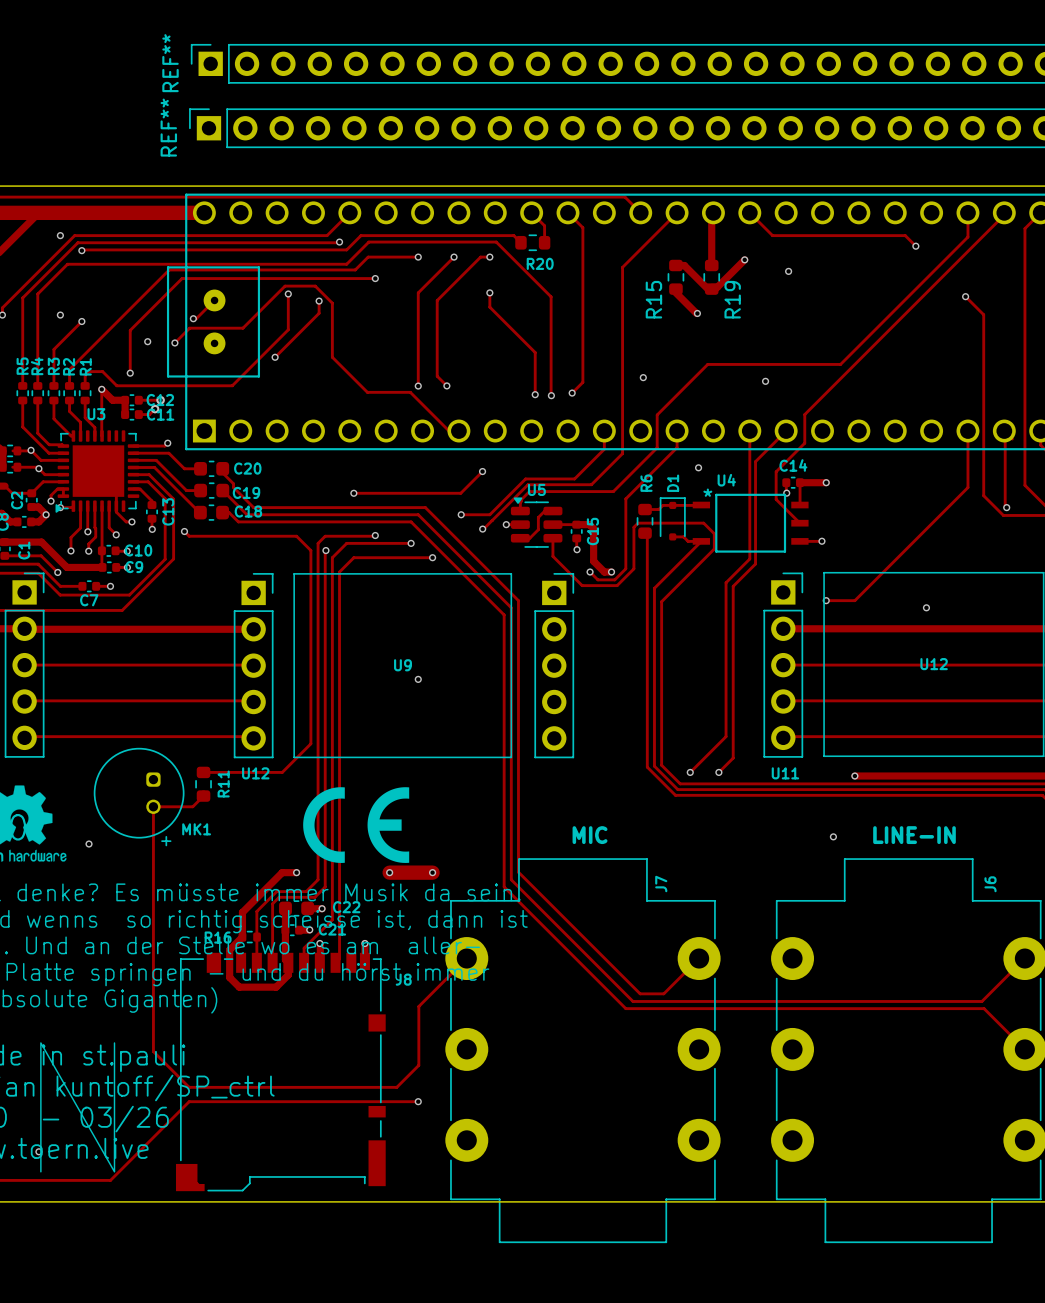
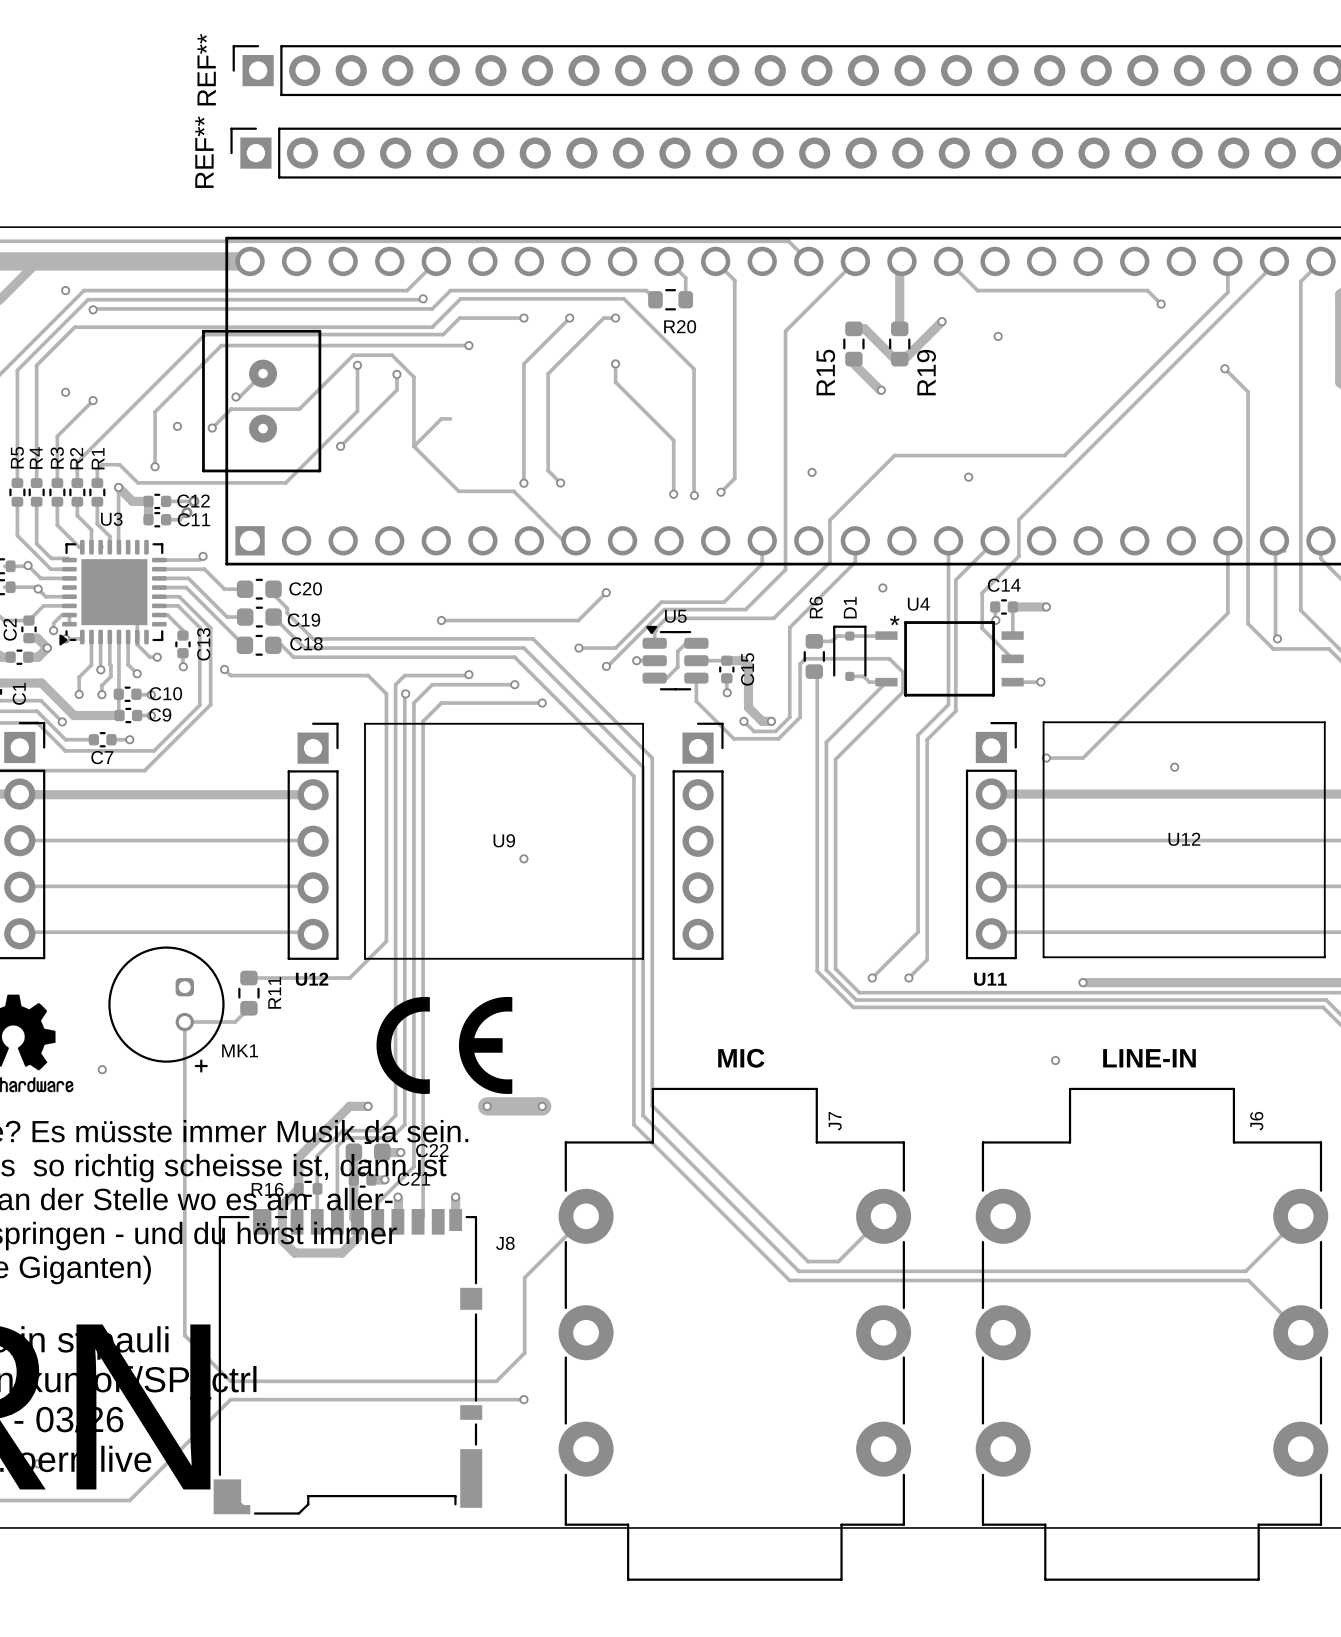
track: none -> (450, 418) (441, 418) (413, 446)

